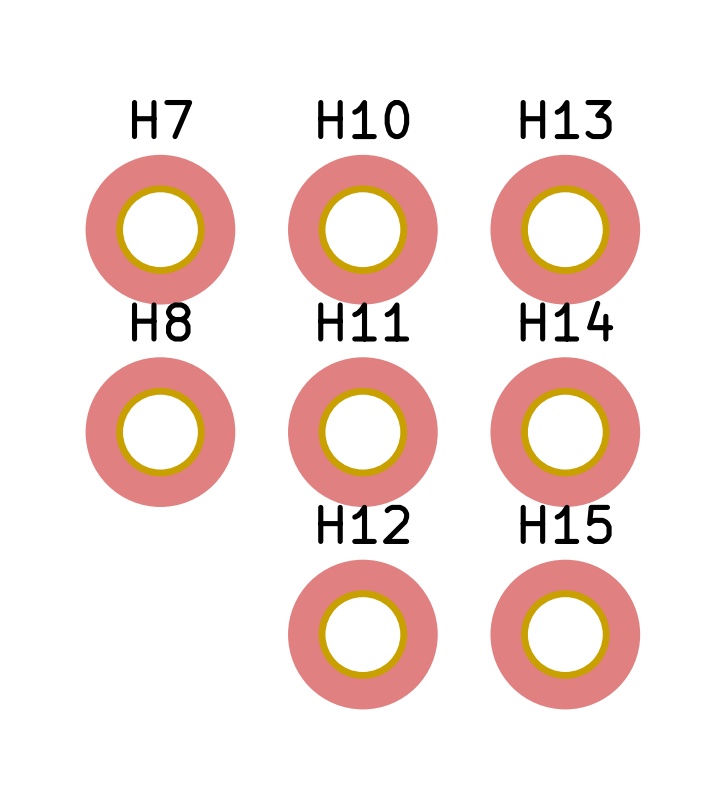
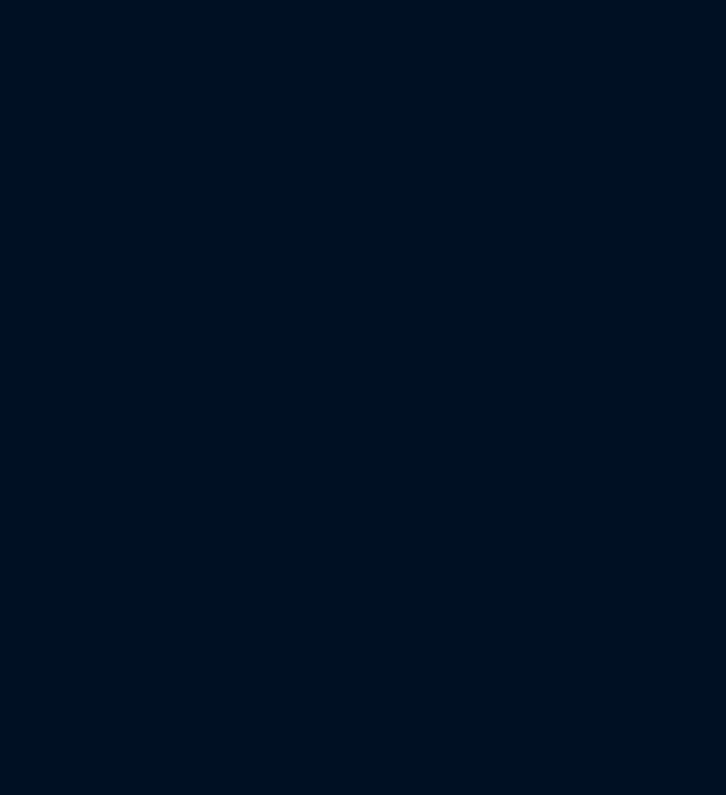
H7: (160, 229) -> none
H10: (362, 229) -> none
H13: (565, 229) -> none
H8: (160, 432) -> none
H11: (362, 432) -> none
H14: (565, 432) -> none
H12: (362, 634) -> none
H15: (565, 634) -> none

